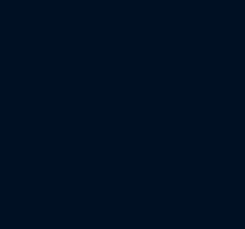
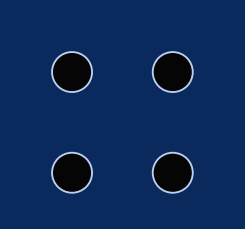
part: none -> (72, 72)
part: none -> (172, 72)
part: none -> (72, 172)
part: none -> (172, 172)

